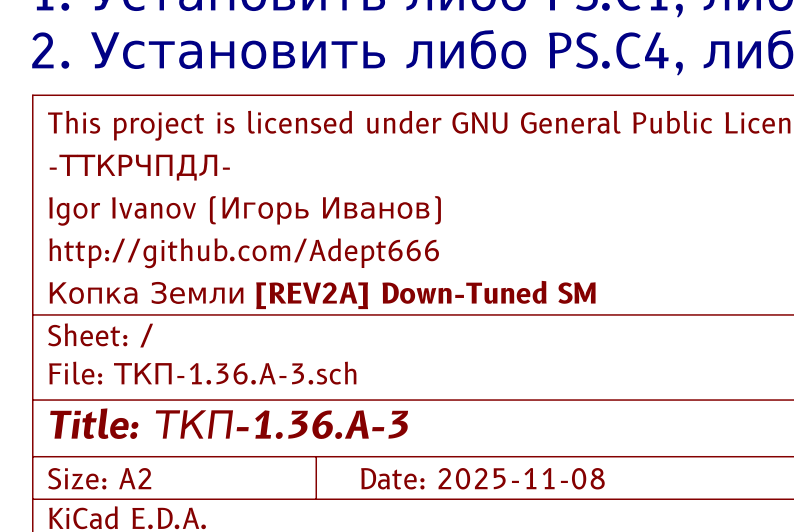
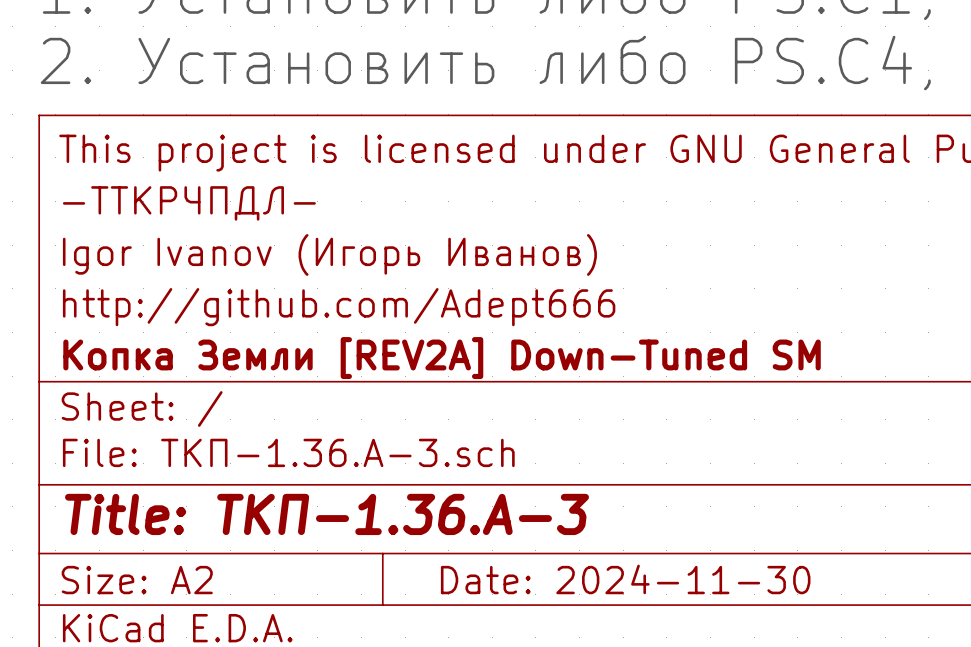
title block: Date: 2025-11-08 (482, 478) -> Date: 2024-11-30 (625, 579)

